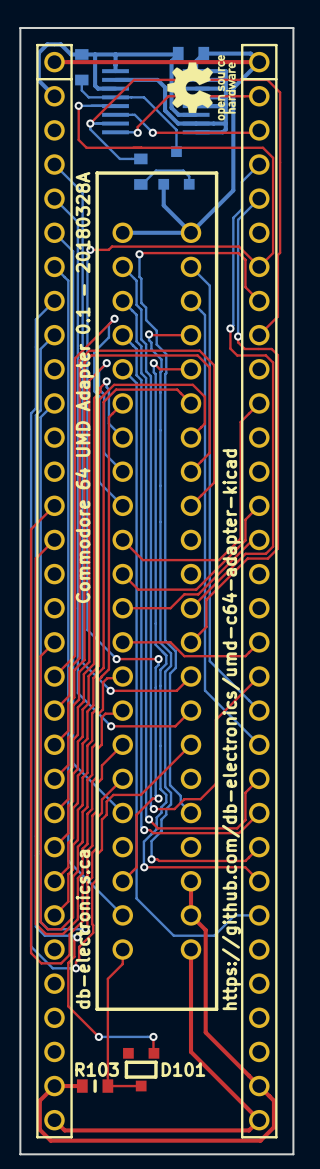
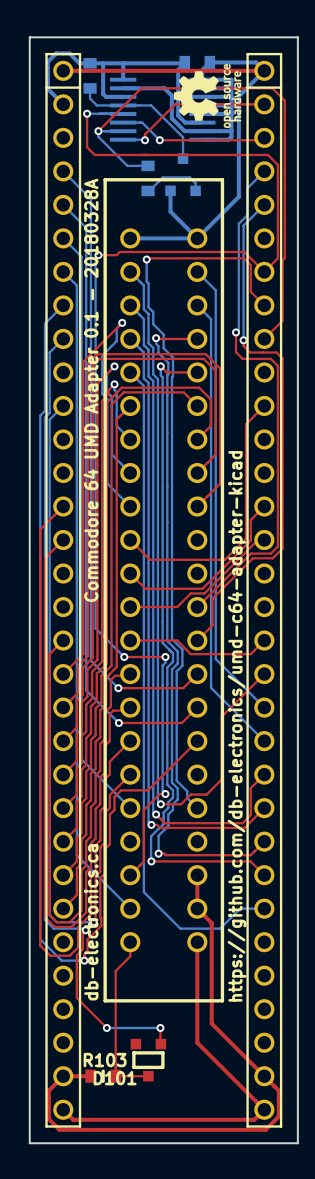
D101 name position: D101 (183, 1069) -> D101 (115, 1078)

